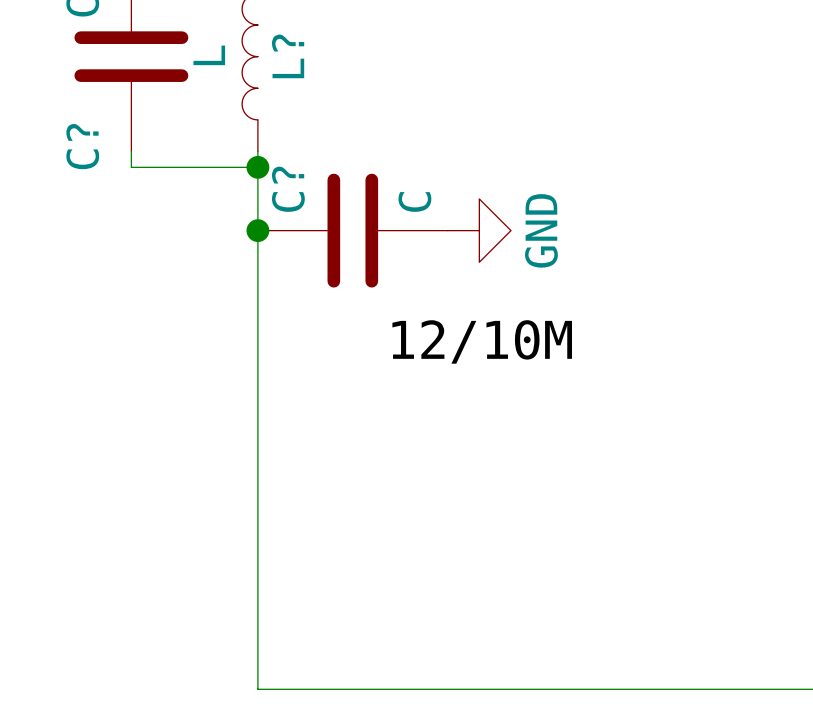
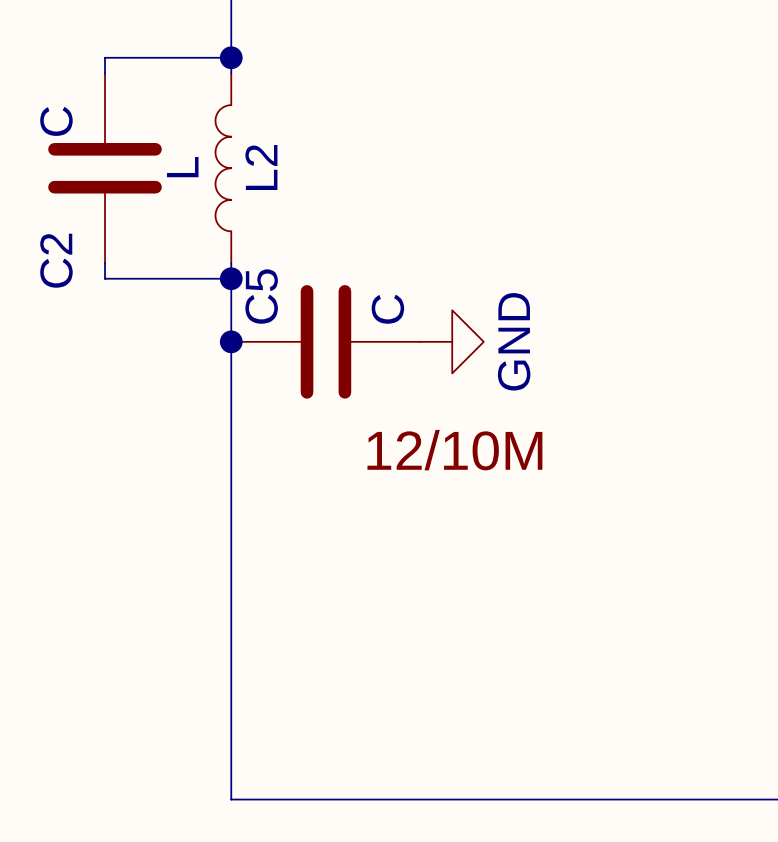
L? name: L? (288, 56) -> L2 (261, 167)
C? name: C? (82, 146) -> C2 (56, 260)
C? name: C? (288, 189) -> C5 (261, 296)

